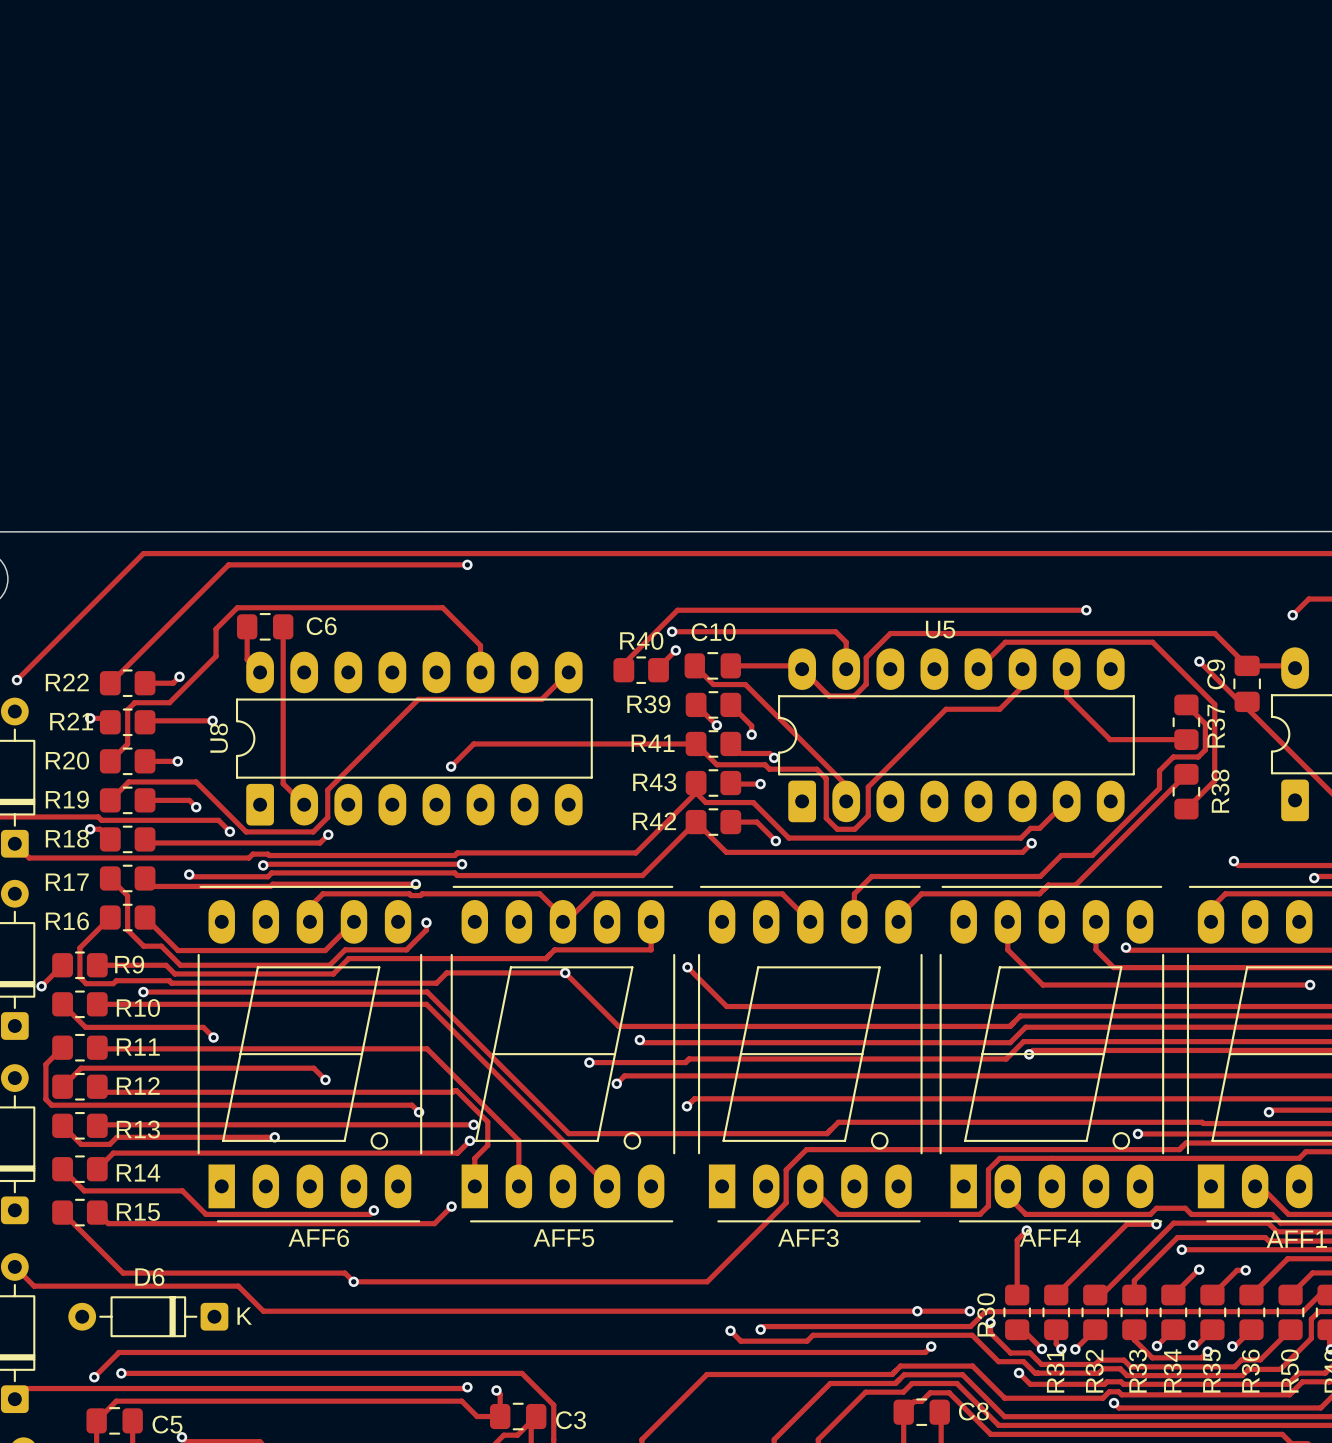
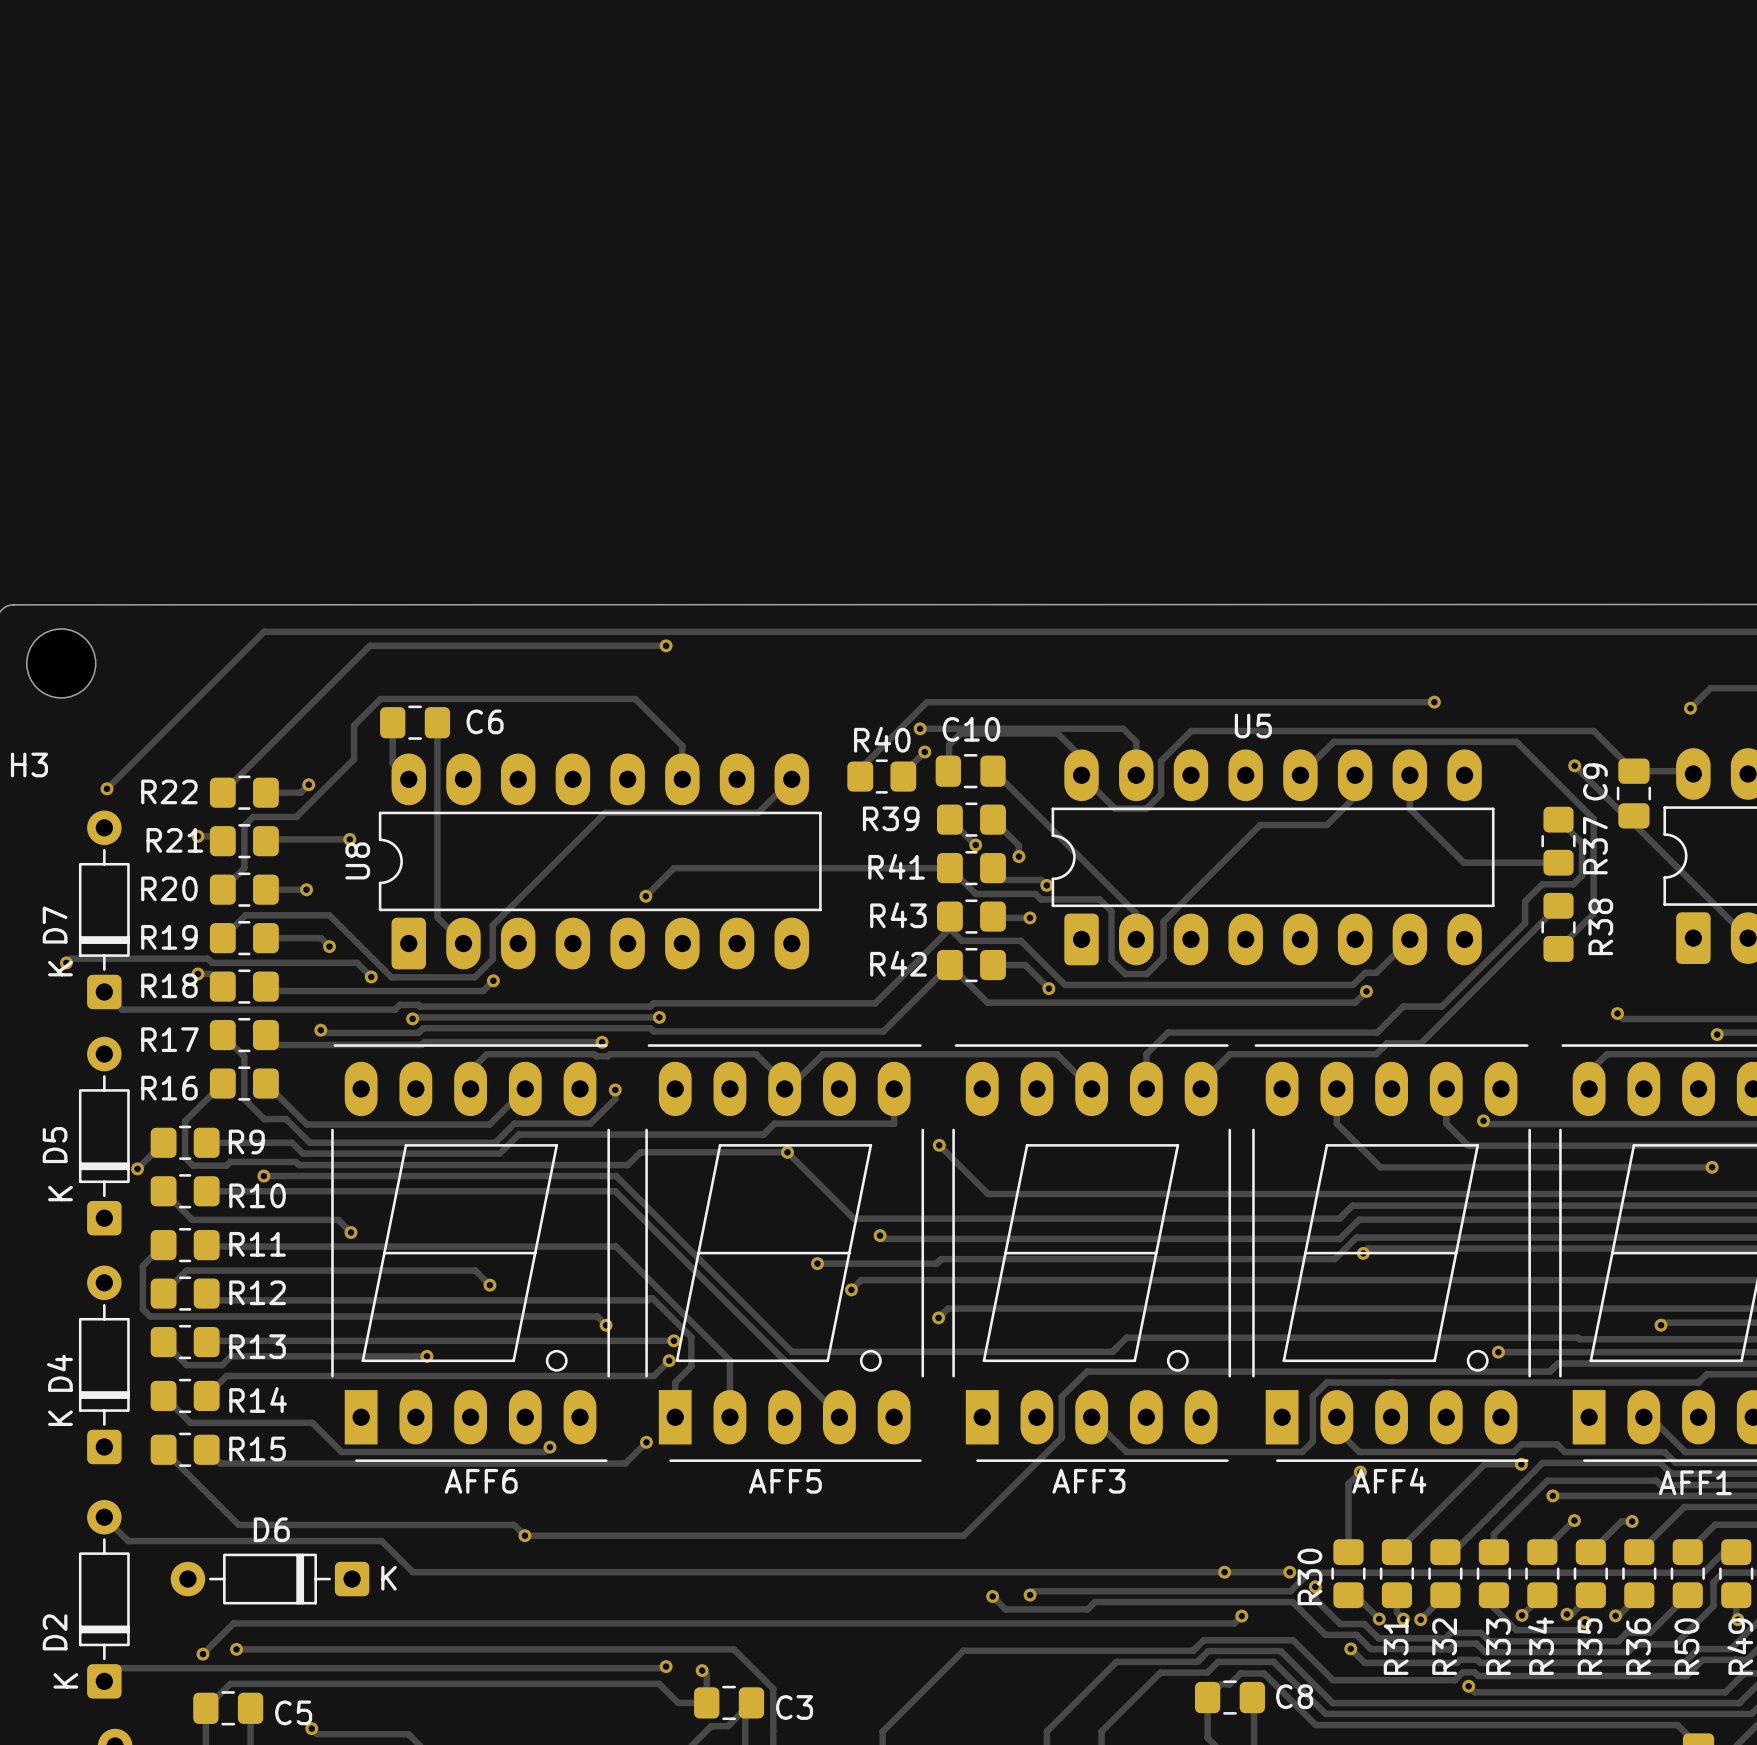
track: (694, 665) (713, 684) (745, 684) (846, 785) -> (993, 771) (1136, 913) (1136, 919)
track: (730, 665) (798, 665) (802, 669) -> (949, 771) (949, 745) (960, 733) (1057, 733) (1081, 757) (1081, 775)

